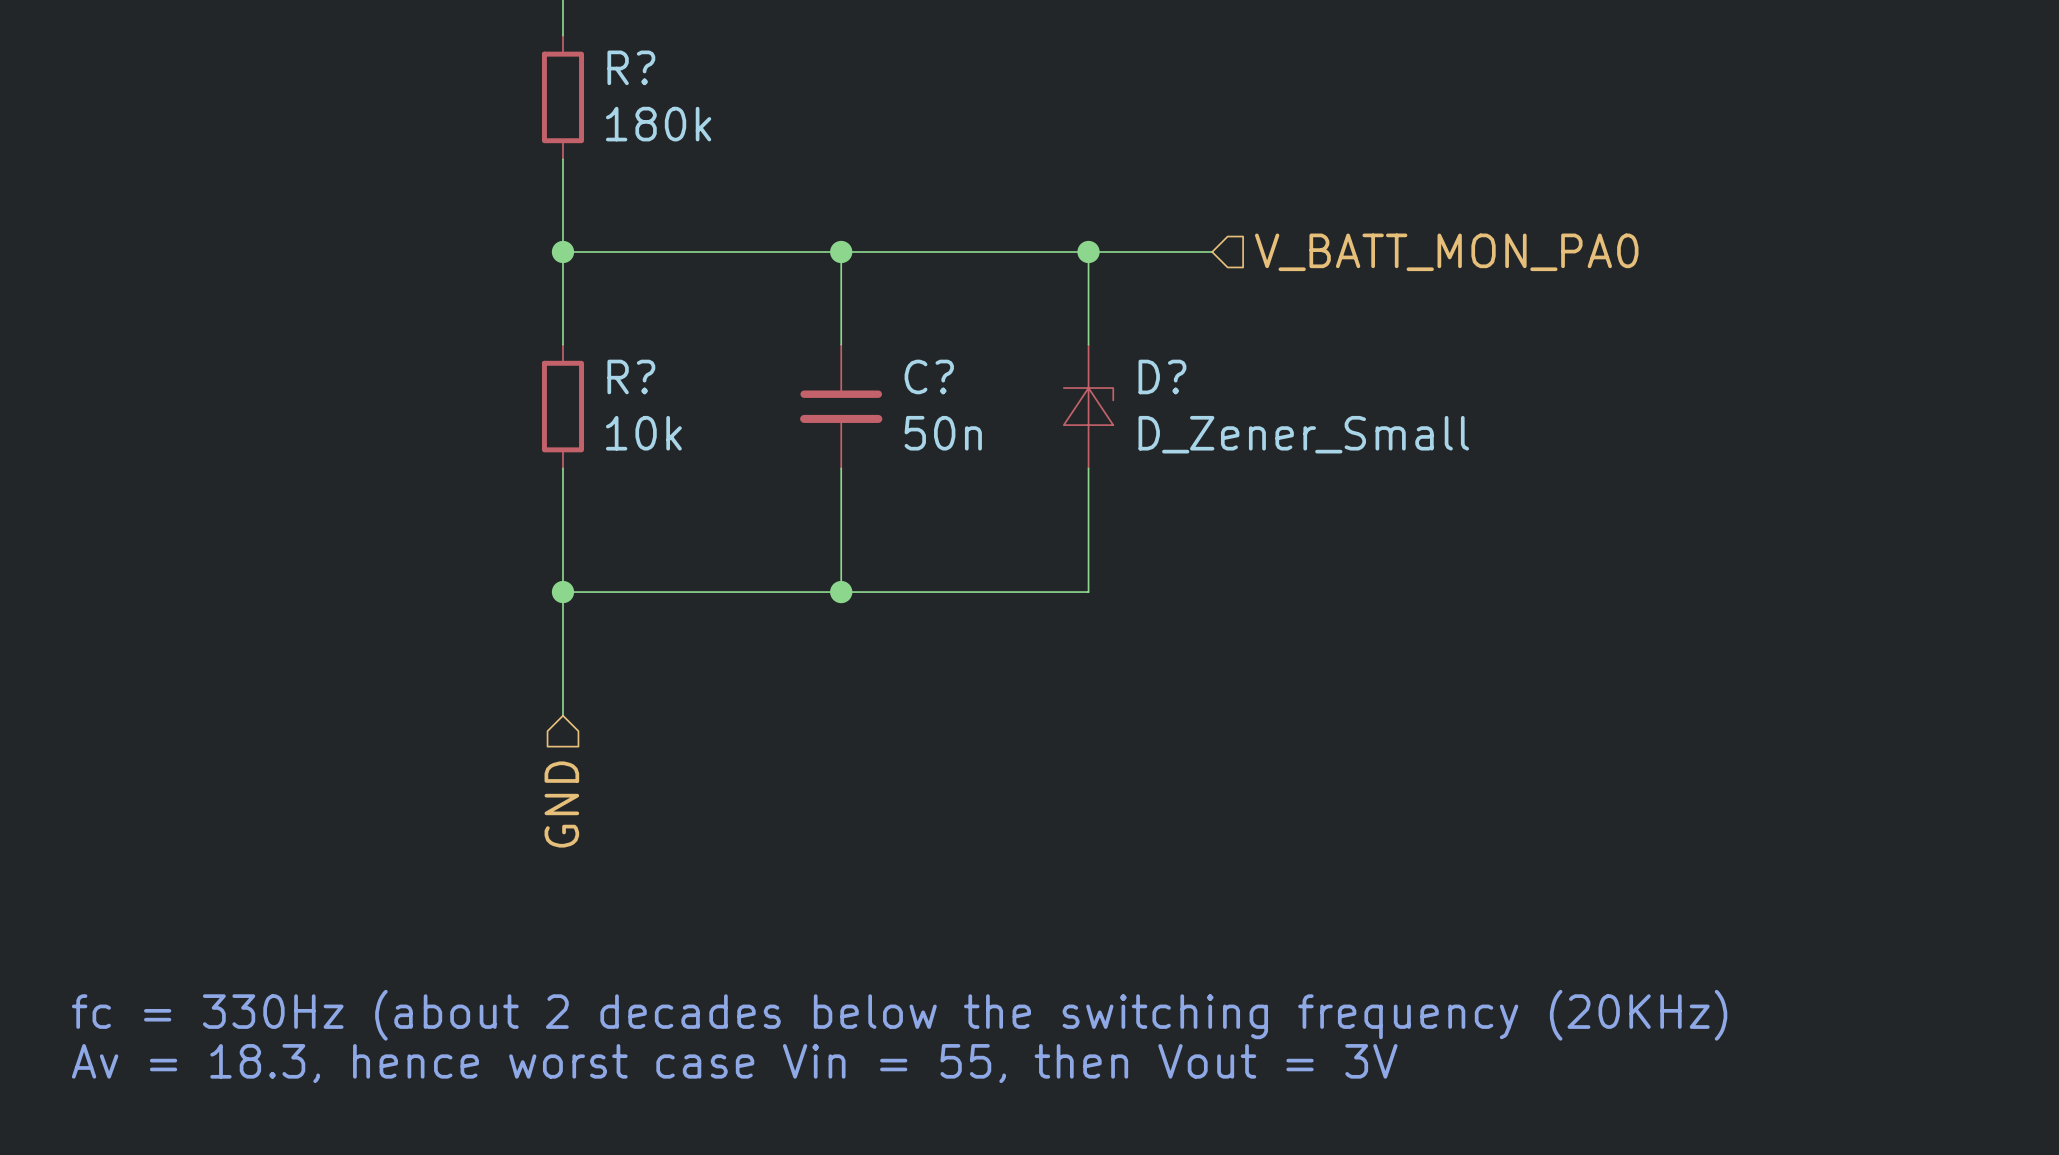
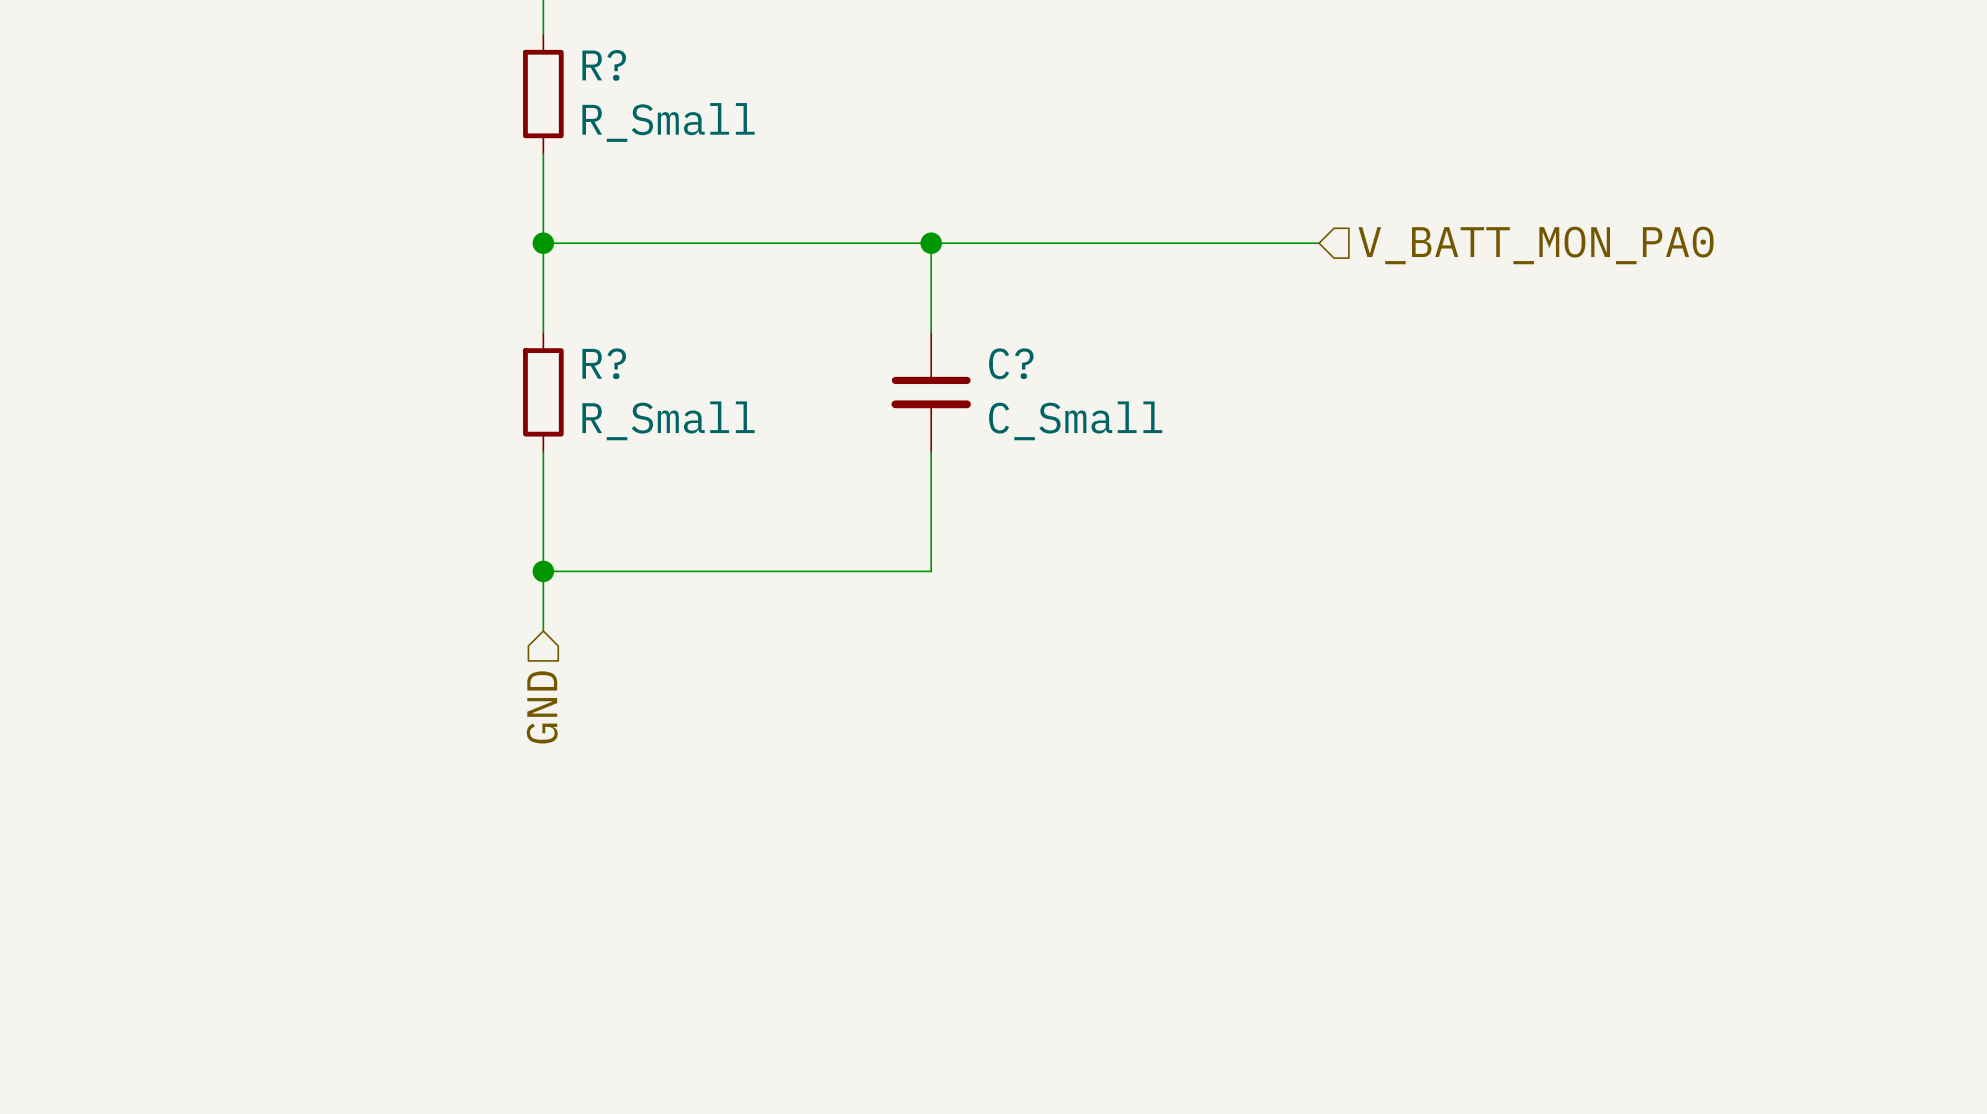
R? value: 180k (658, 124) -> R_Small (668, 122)
wire: (841, 251) (841, 344) -> (931, 243) (931, 332)
junction: (841, 251) -> none
junction: none -> (931, 243)
wire: (1088, 251) (1088, 344) -> none
junction: (1088, 251) -> none
wire: none -> (1169, 243) (1319, 243)
hierarchical label position: V_BATT_MON_PA0 (1446, 252) -> V_BATT_MON_PA0 (1536, 245)
C?: 50n (841, 406) -> none
C?: none -> C_Small (931, 392)
D?: D_Zener_Small (1088, 406) -> none
R? value: 10k (643, 433) -> R_Small (668, 420)
wire: (841, 468) (841, 592) -> none
wire: (1088, 468) (1088, 592) (964, 592) -> (931, 452) (931, 571)
junction: (841, 592) -> none
wire: (562, 653) (562, 715) -> none
hierarchical label position: GND (561, 804) -> GND (542, 707)
text: fc = 330Hz (about 2 decades below the switching frequency (20KHz) (899, 1015) -> none
text: Av = 18.3, hence worst case Vin = 55, then Vout = 3V (734, 1063) -> none

